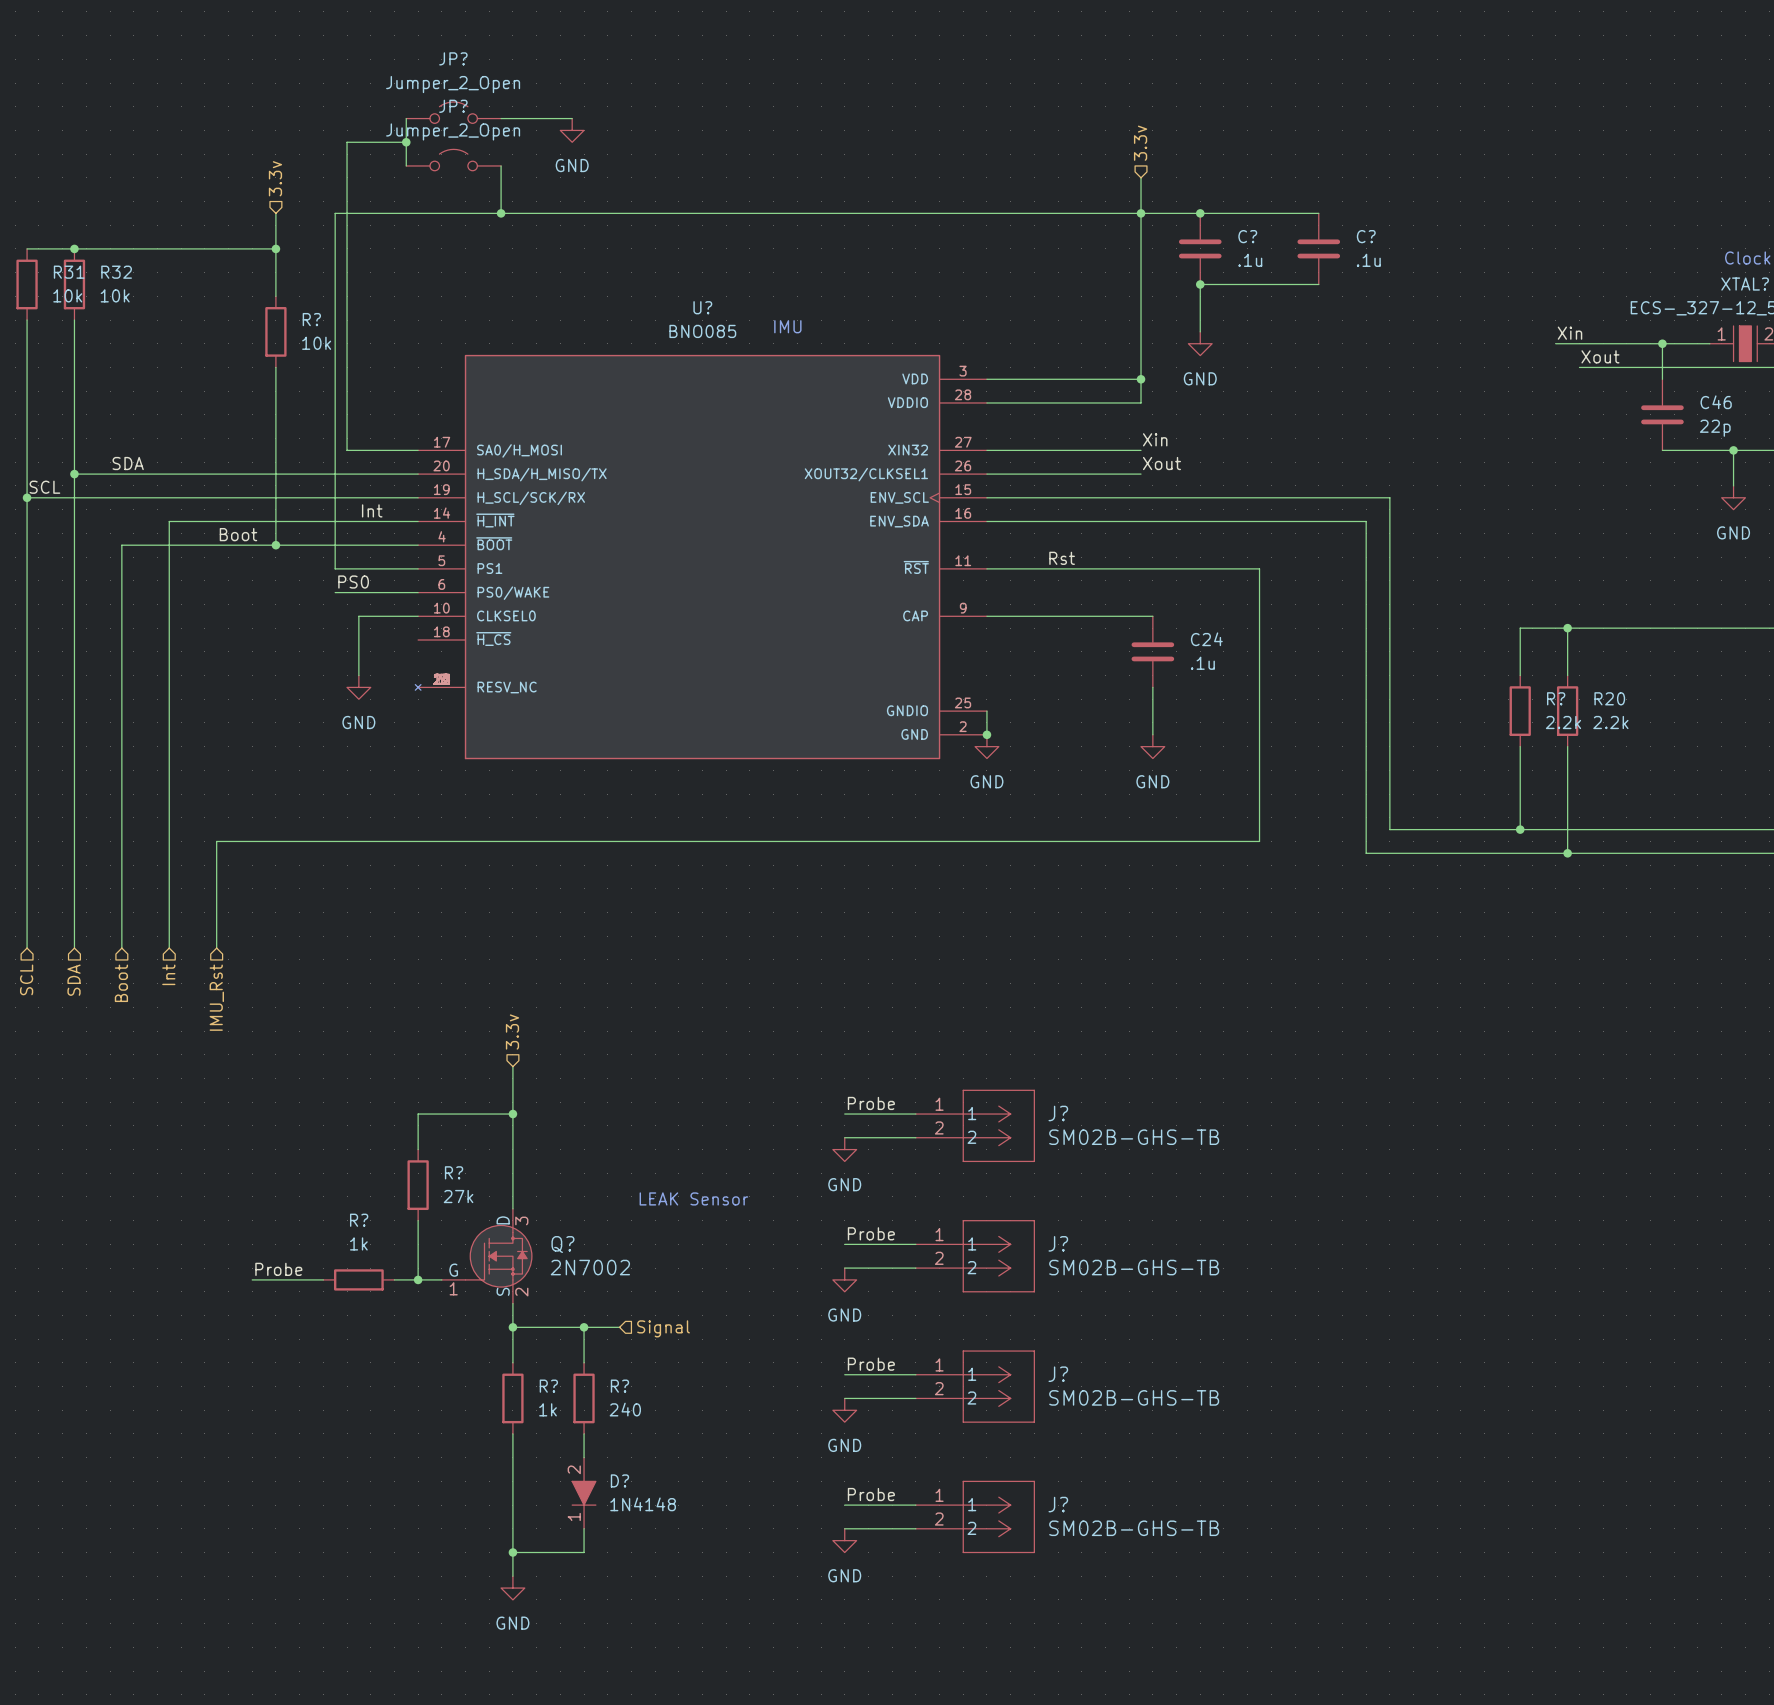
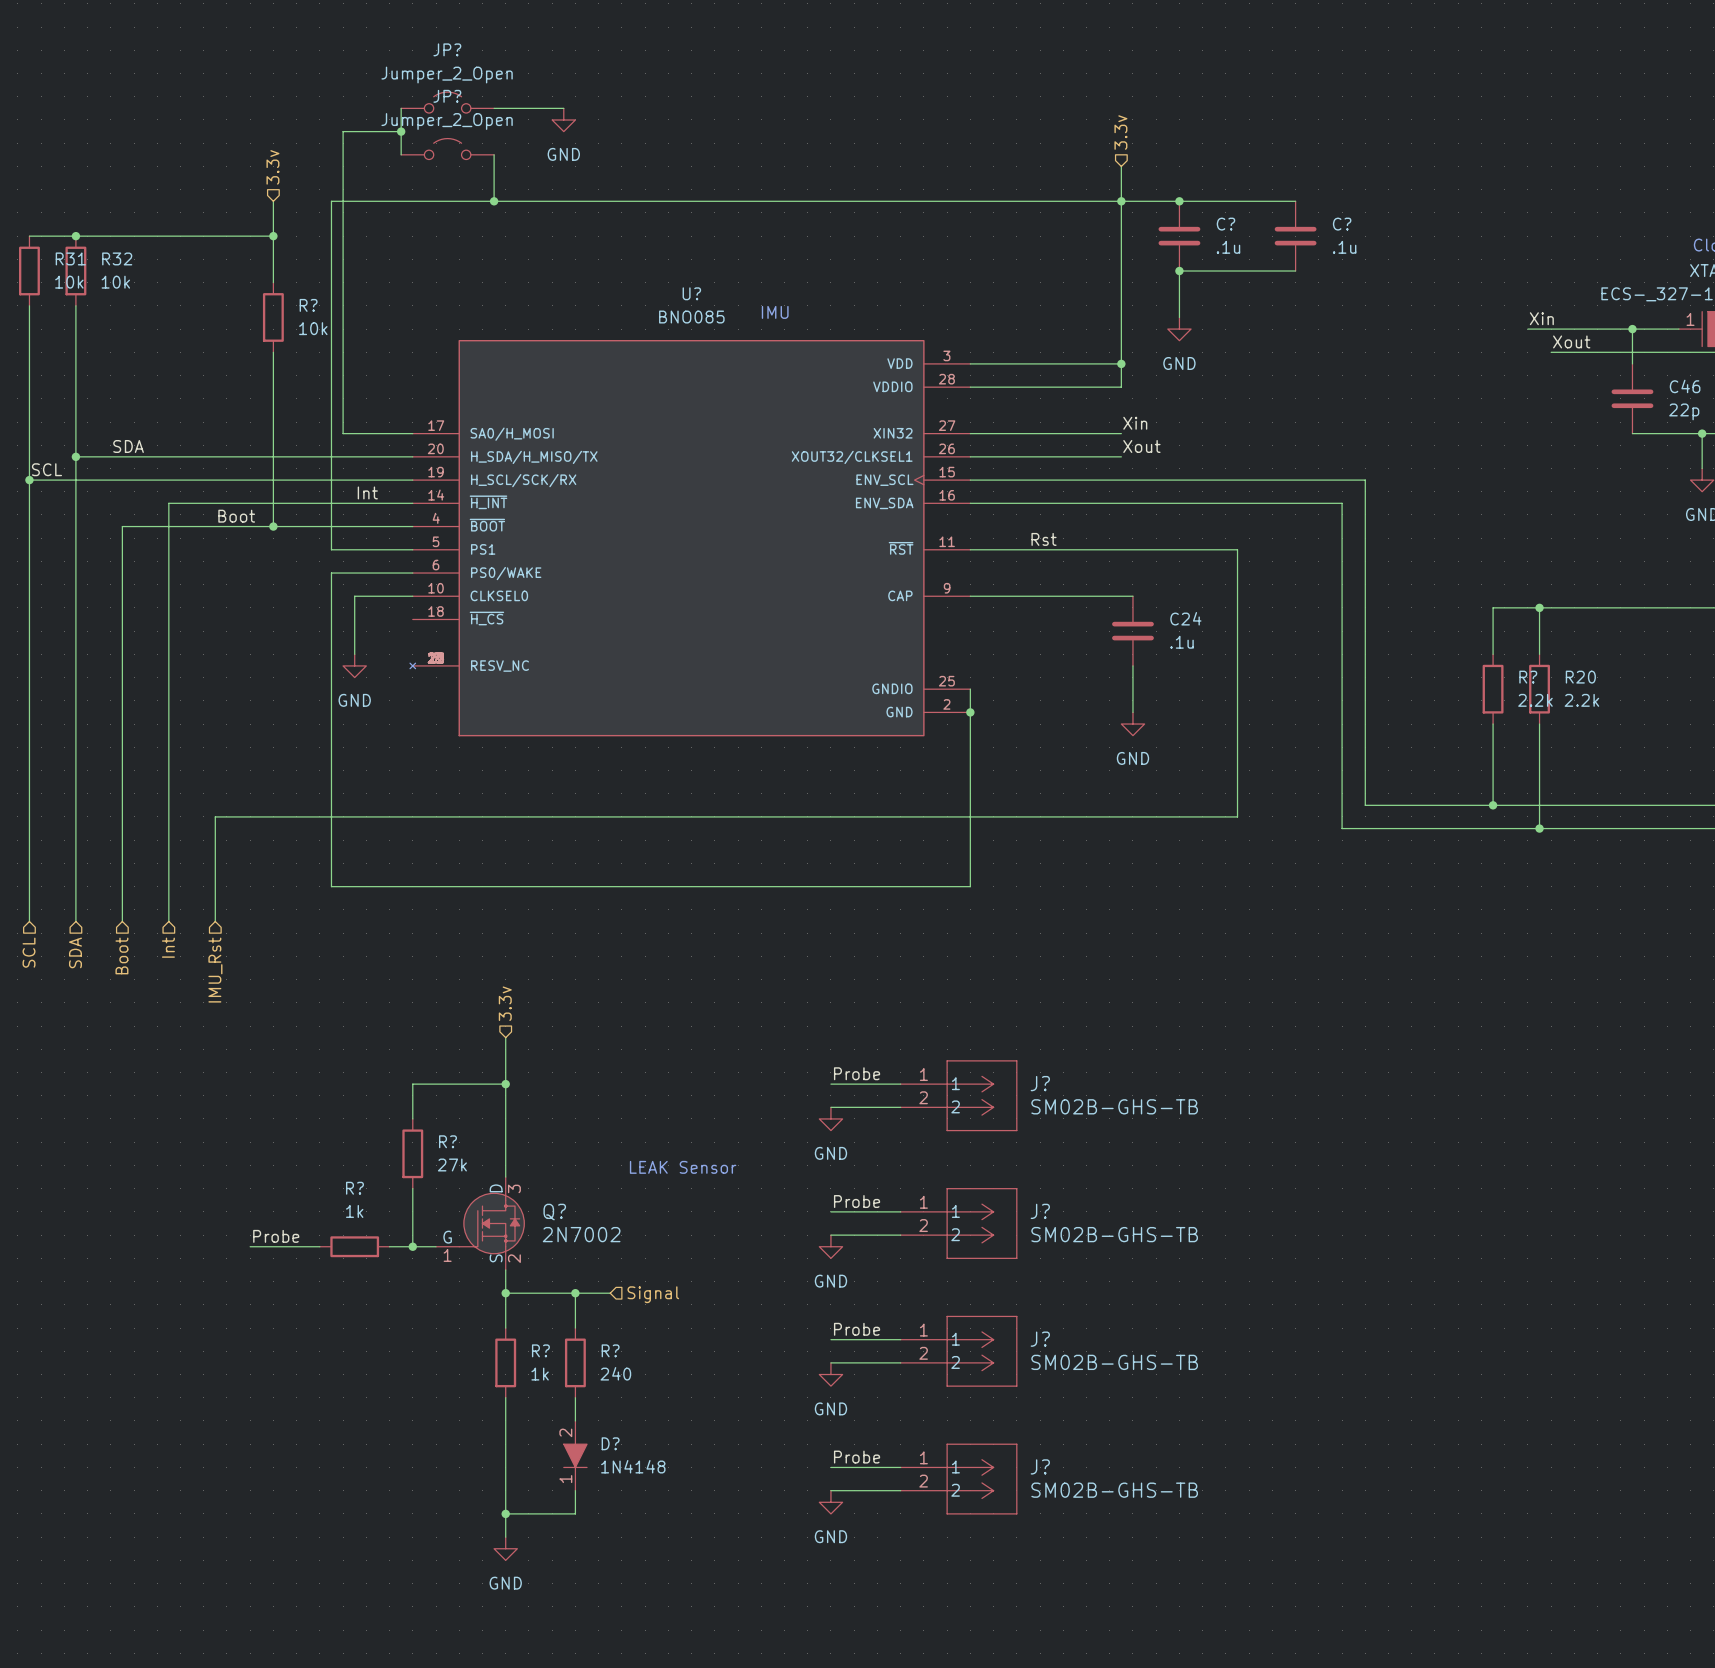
label: PS0 (353, 582) -> none
wire: none -> (331, 573) (331, 886) (970, 886) (970, 712)
power symbol: GND (986, 746) -> none

